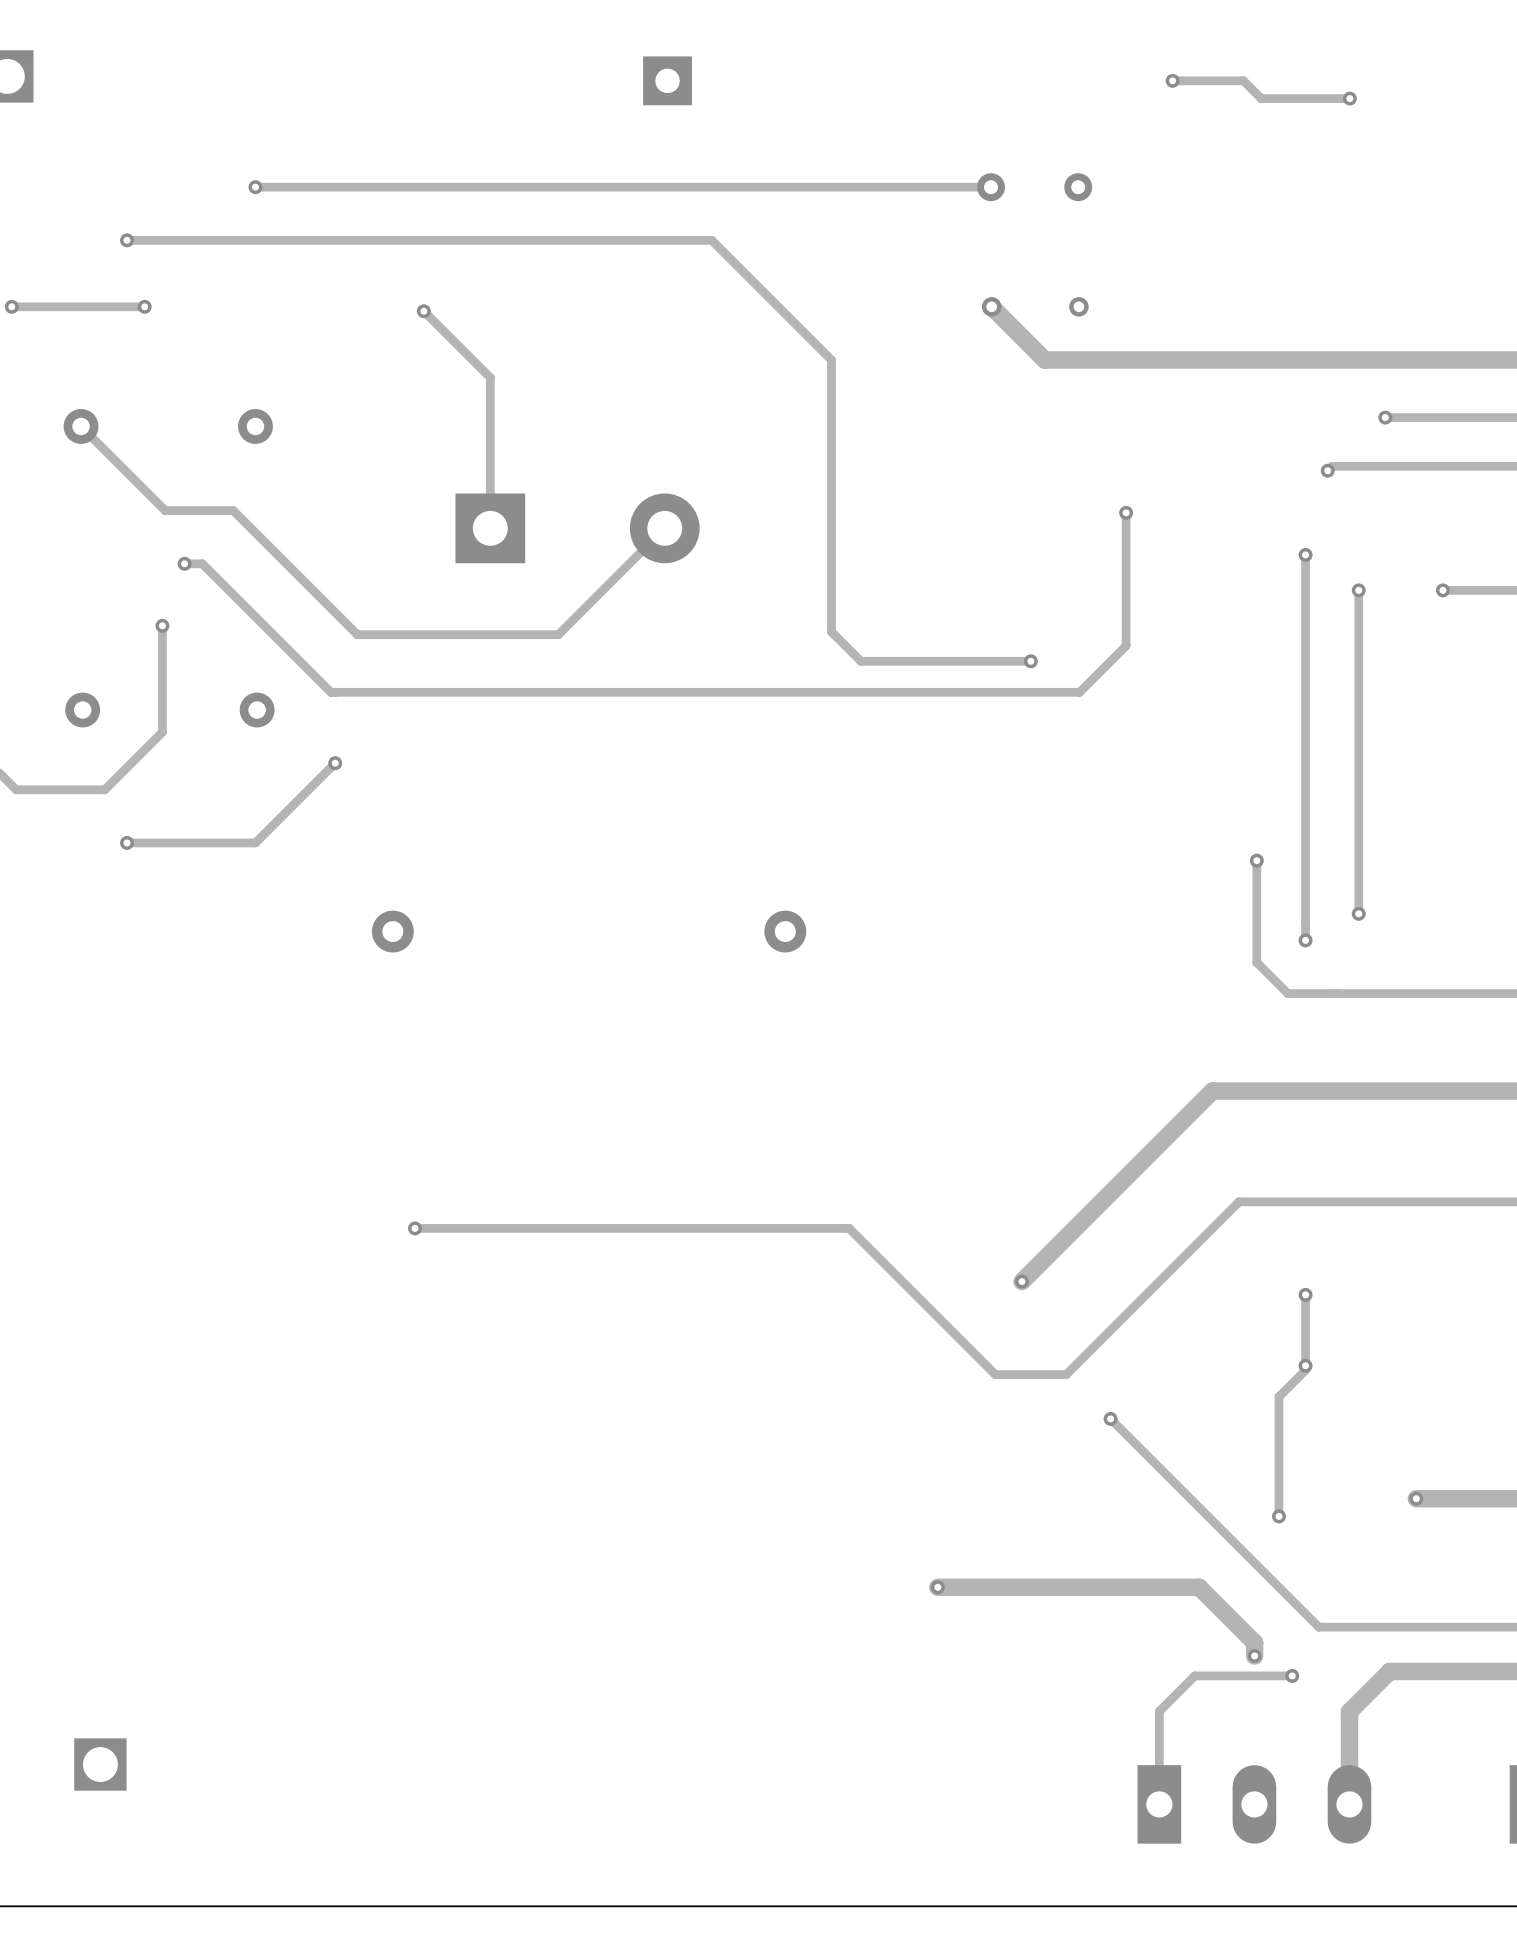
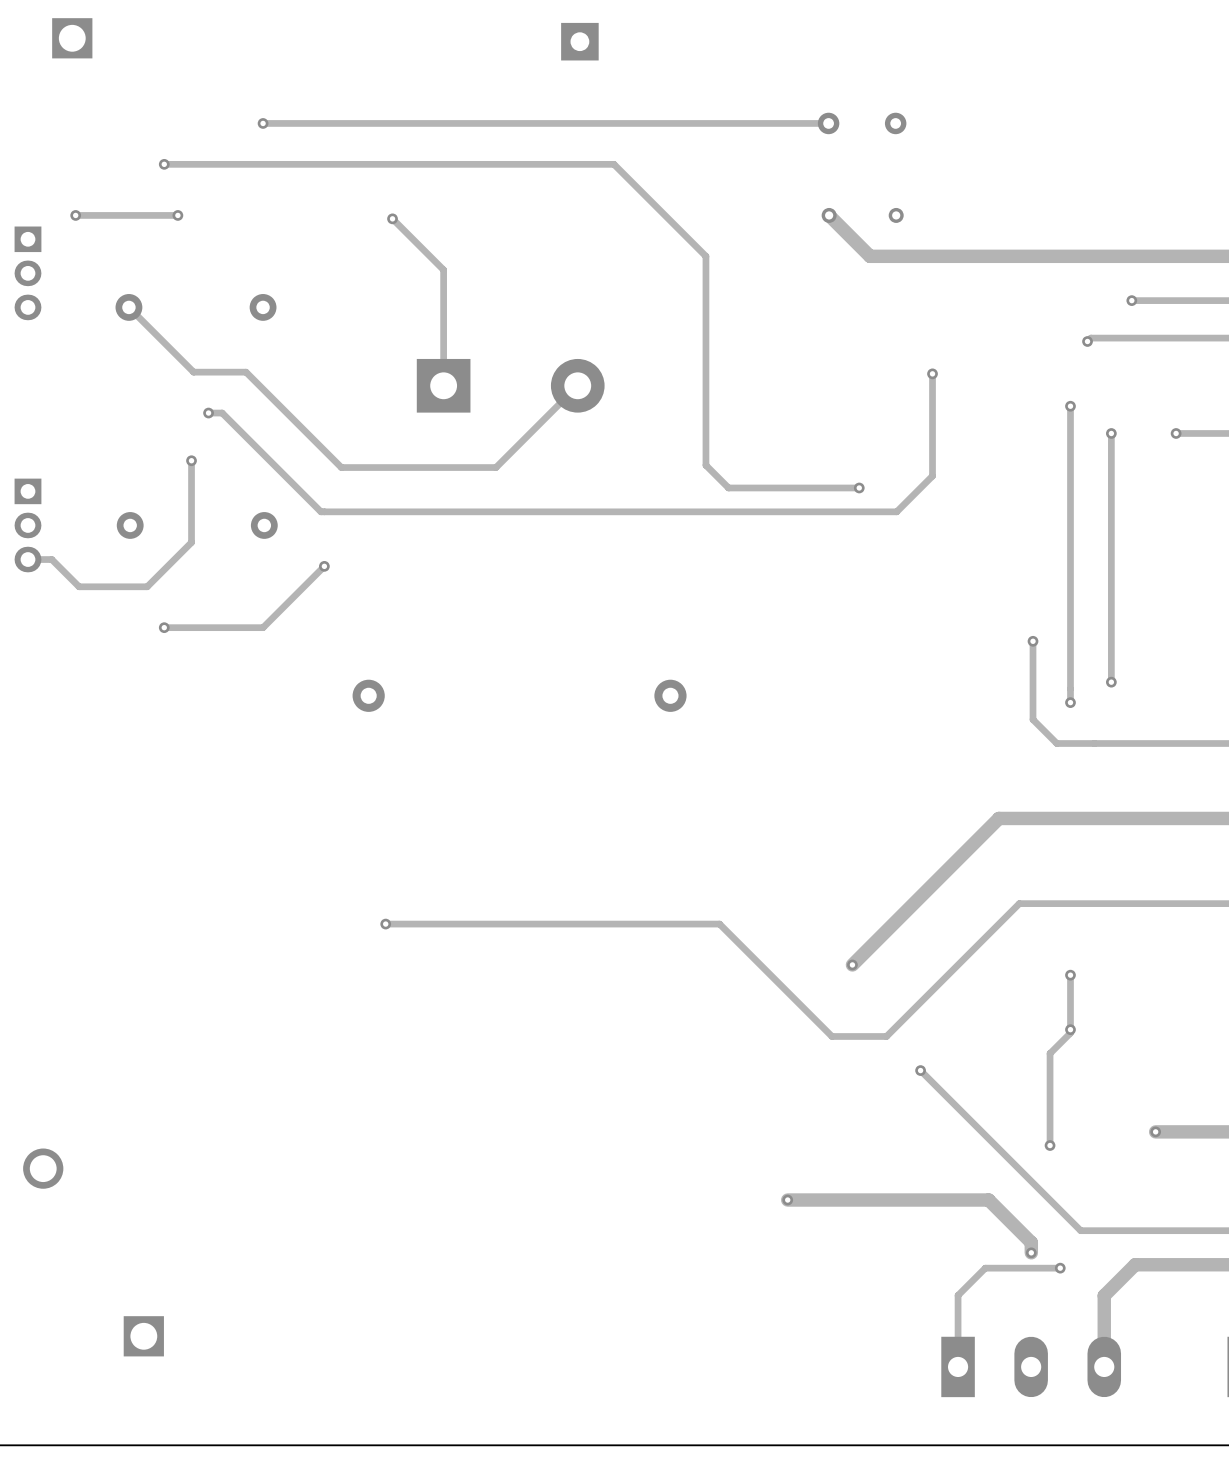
track: (1172, 80) (1243, 80) (1261, 98) (1349, 98) -> none
via: (1172, 80) -> none
via: (1349, 98) -> none

